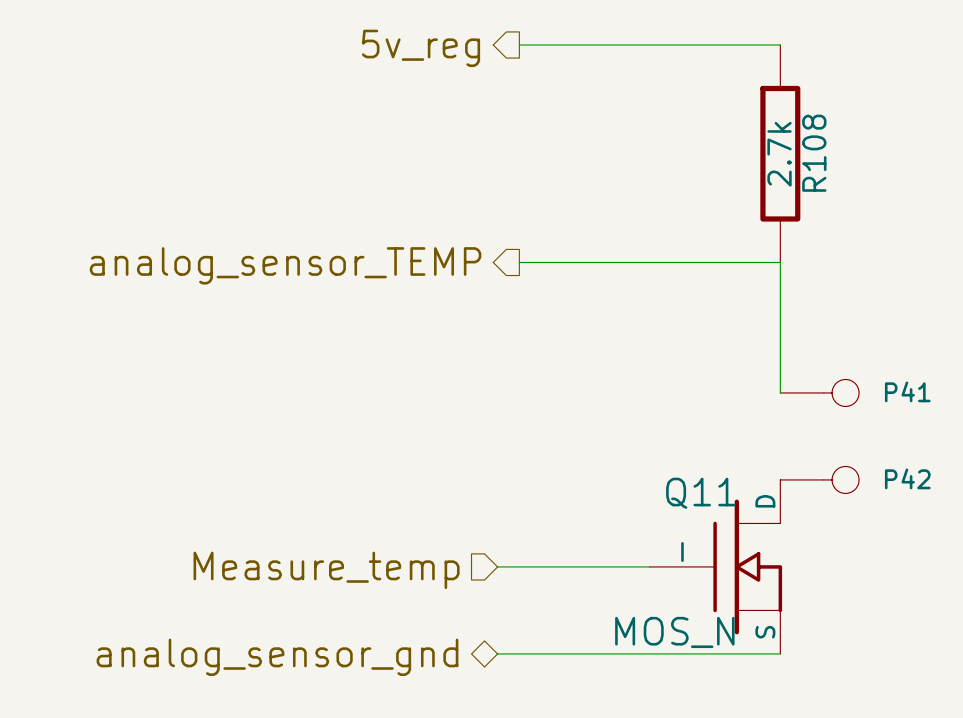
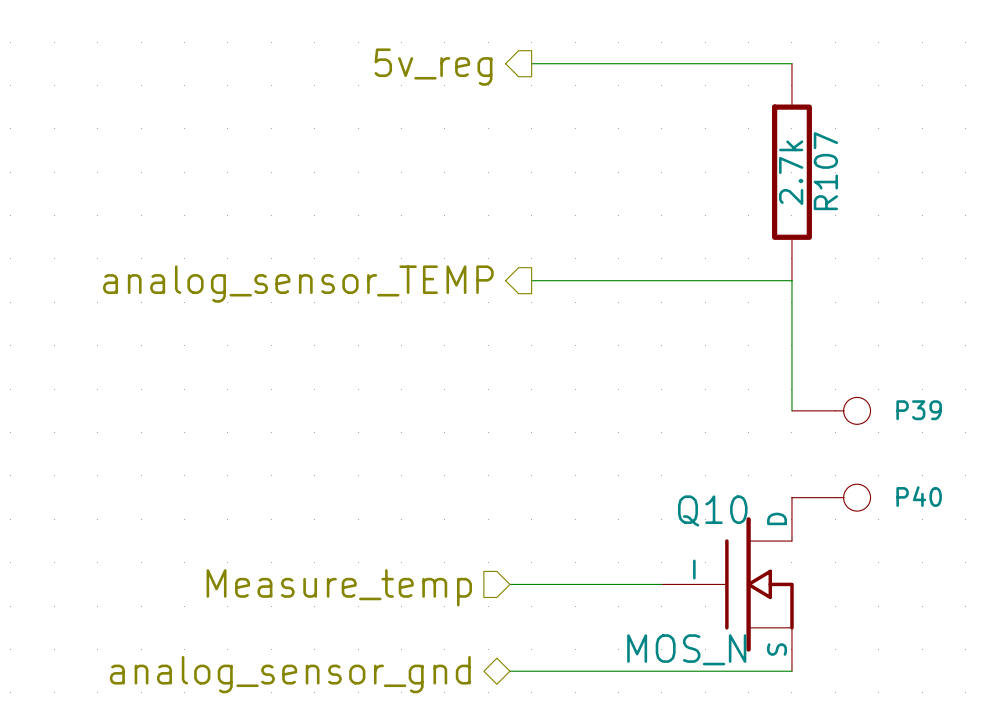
R108 name: R108 (814, 153) -> R107 (825, 171)
P41 name: P41 (907, 391) -> P39 (919, 410)
P42 name: P42 (907, 478) -> P40 (919, 496)
Q11 name: Q11 (700, 493) -> Q10 (712, 510)

